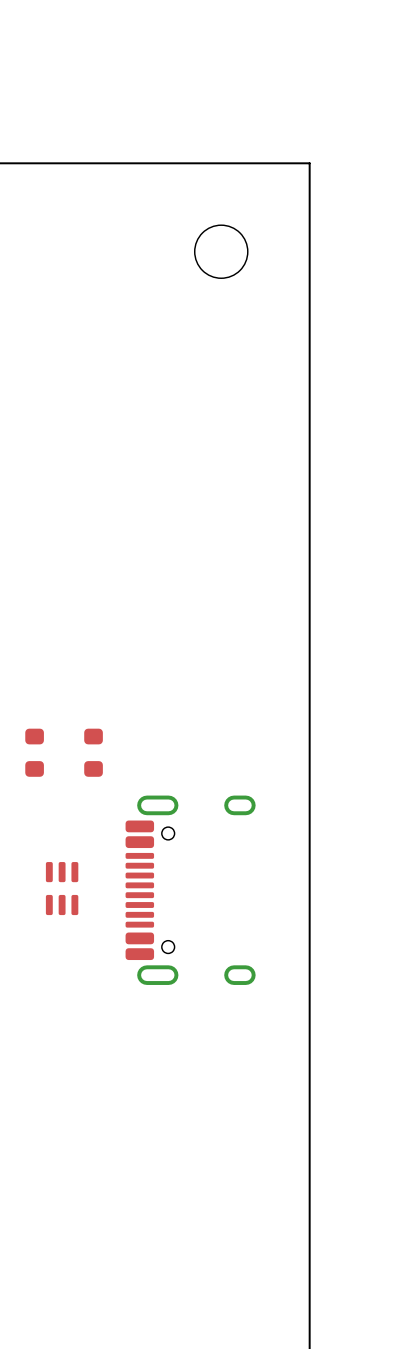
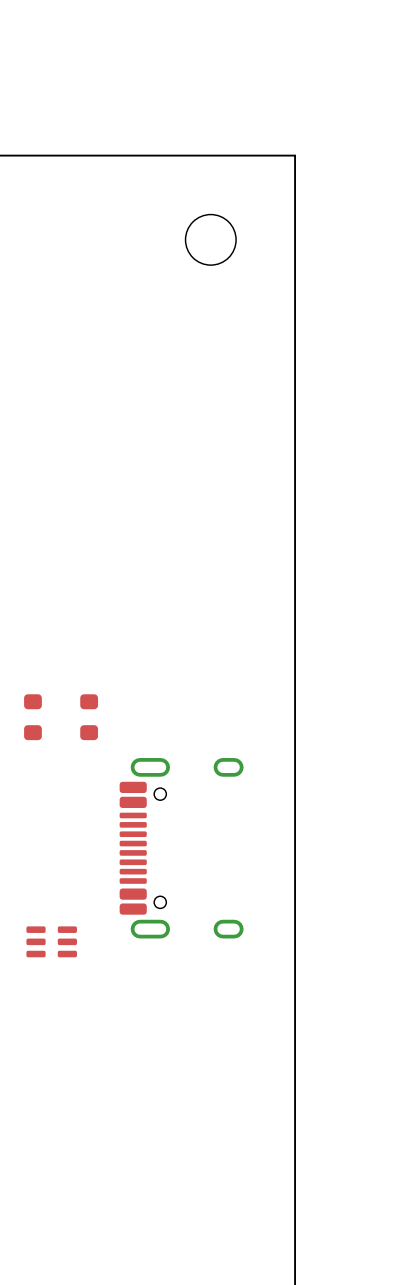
part rotation: 0° (62, 888) -> 90° clockwise (51, 941)
part position: (62, 888) -> (51, 941)

